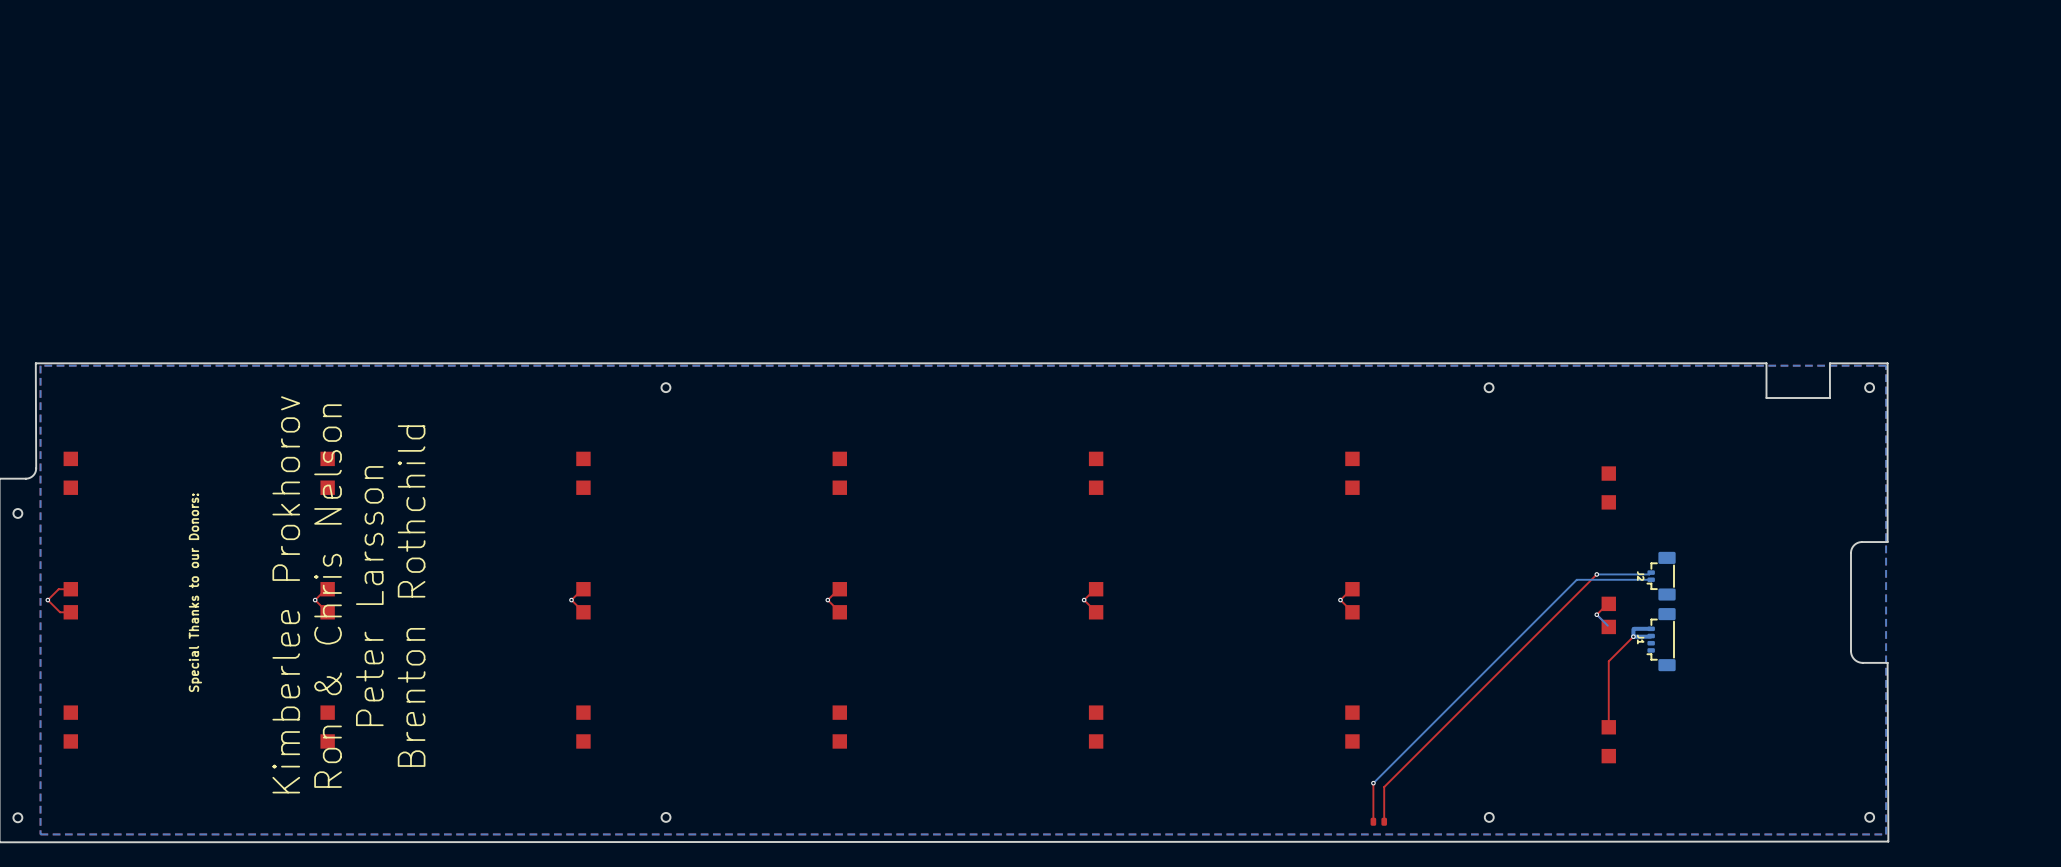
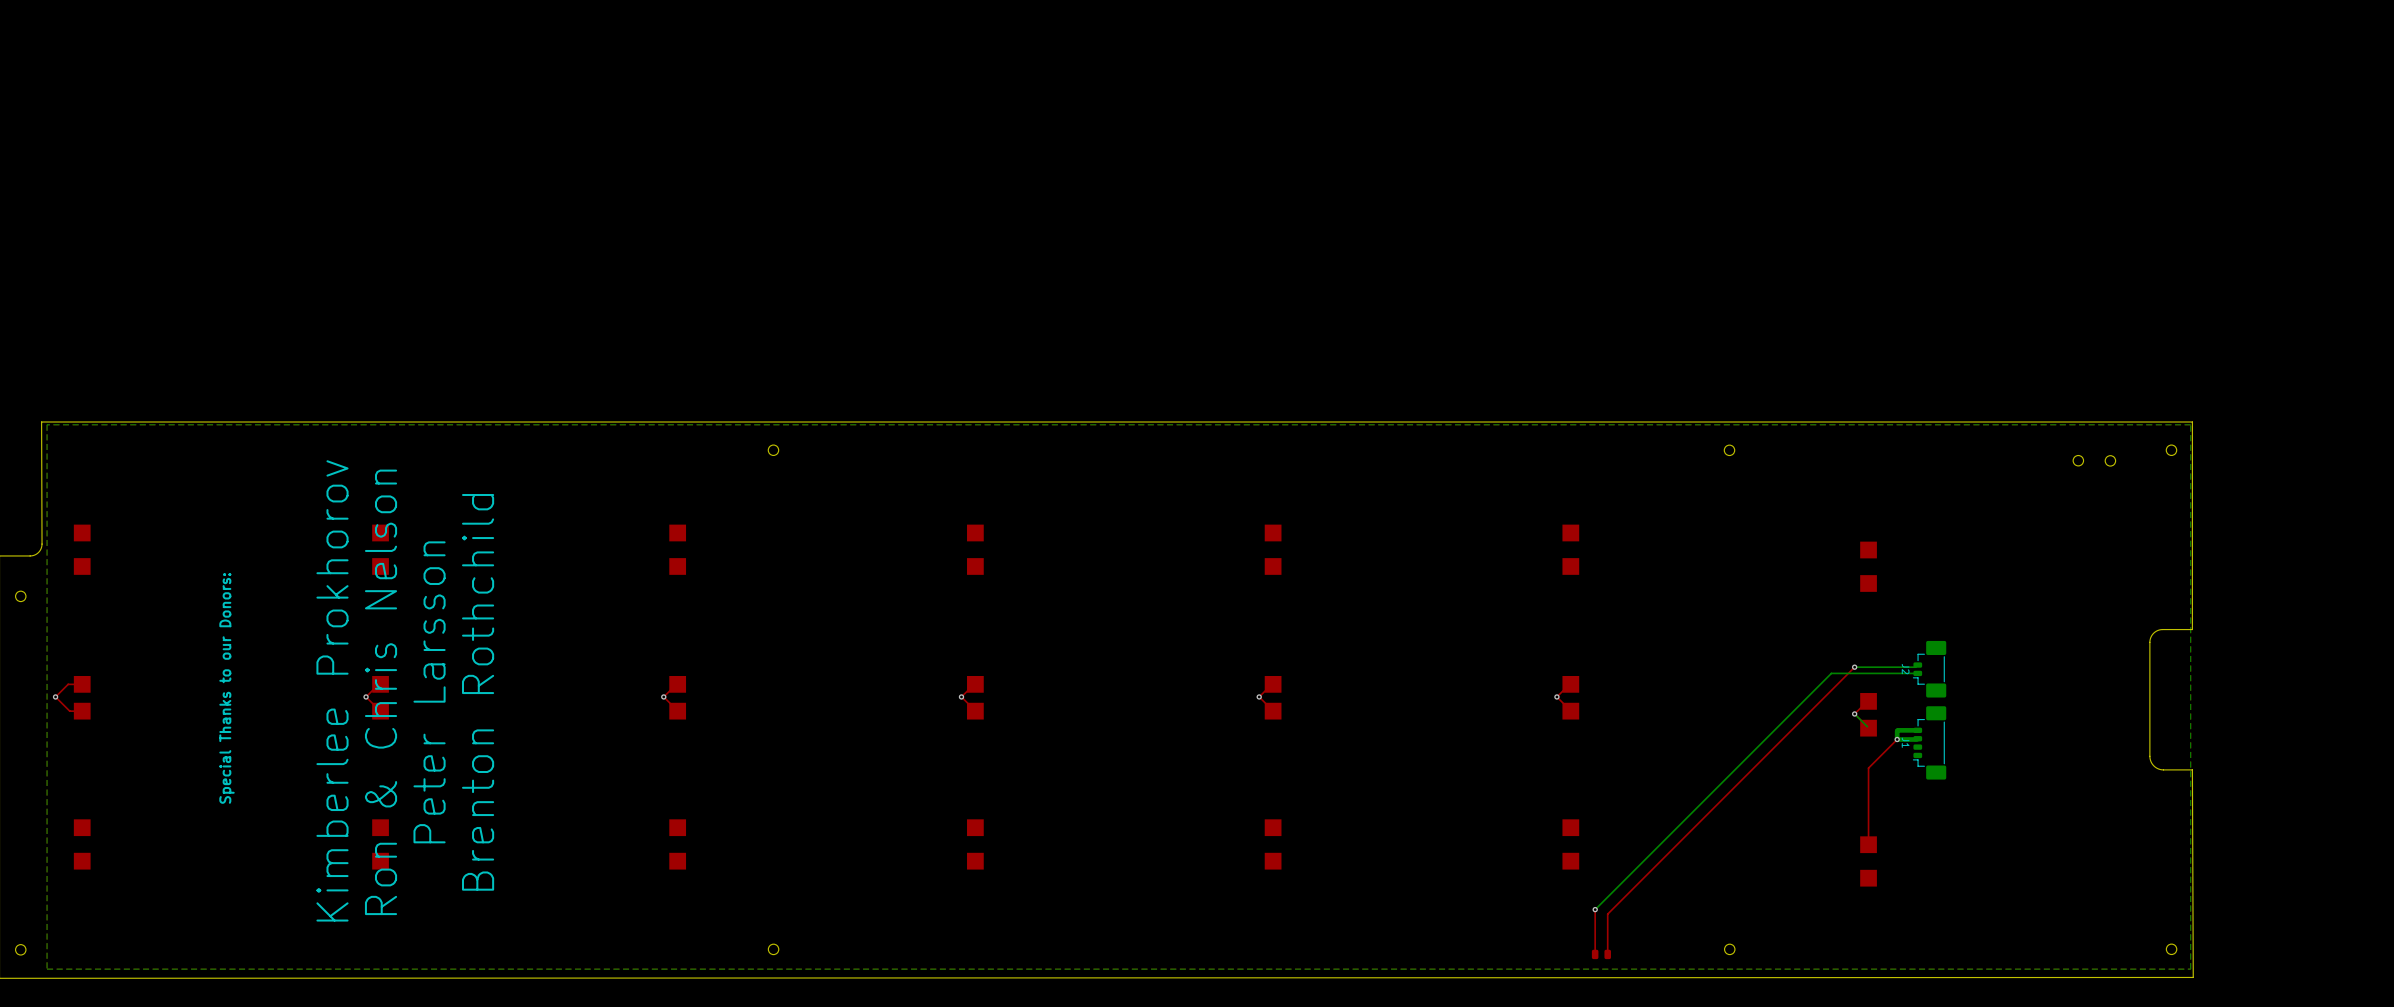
board edge: (1887, 363) (1829, 363) (1829, 398) (1766, 398) (1766, 363) (35, 363) -> (2192, 422) (41, 422)
round board edge: none -> [2072, 455, 2085, 467]
round board edge: none -> [2104, 455, 2117, 467]

